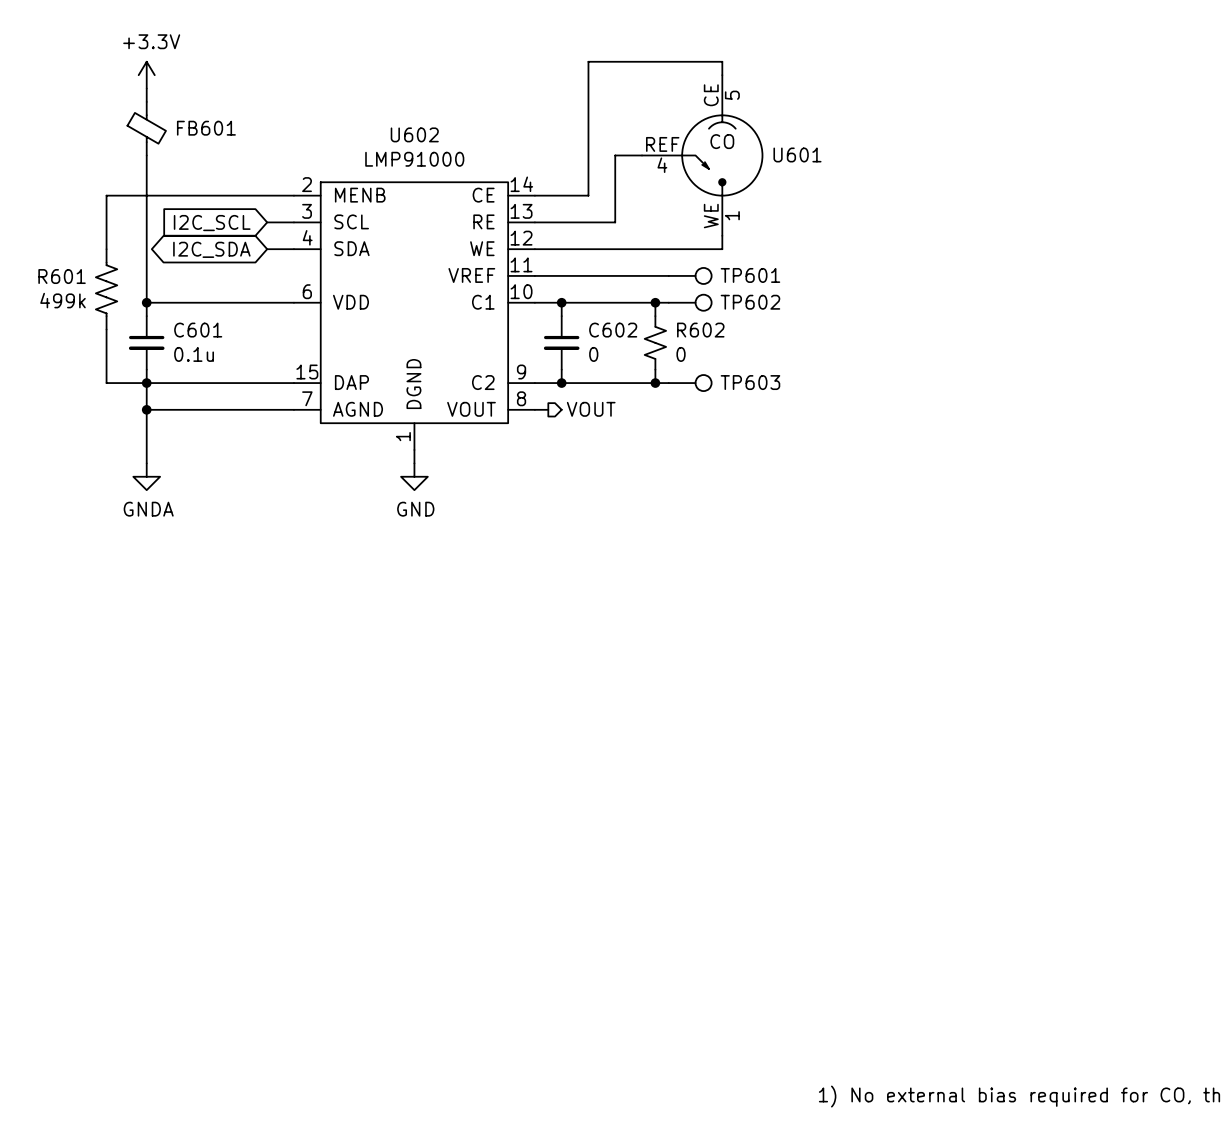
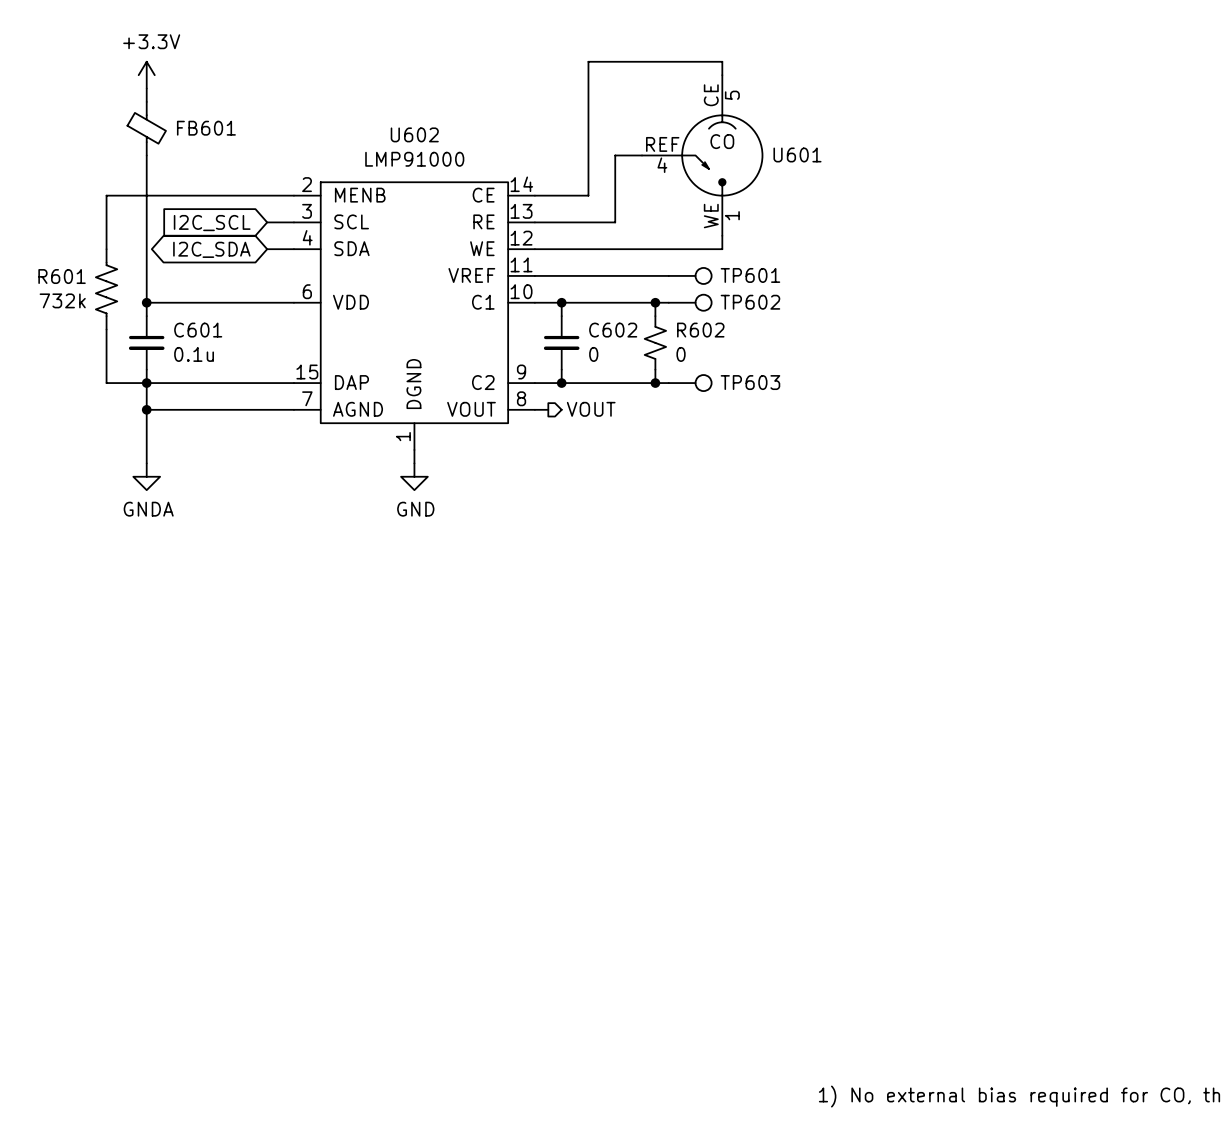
R601 value: 499k (63, 300) -> 732k (62, 300)

